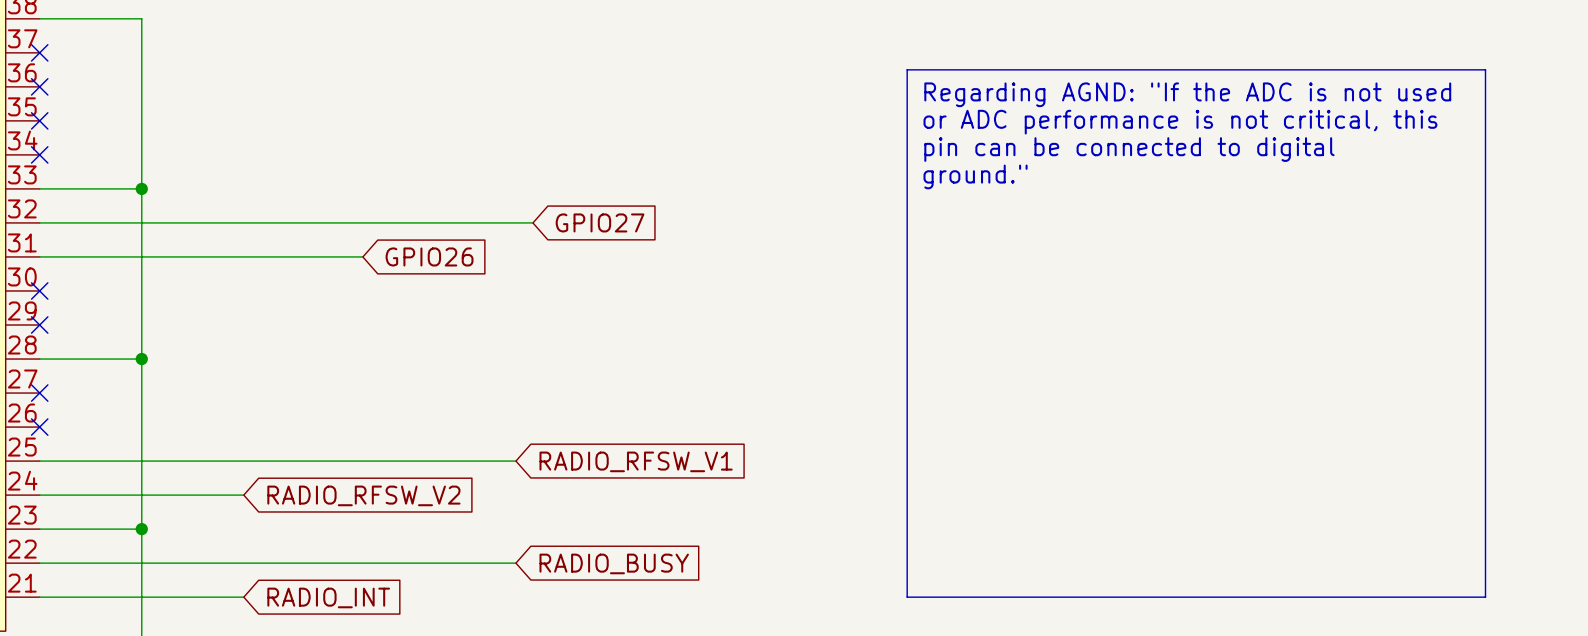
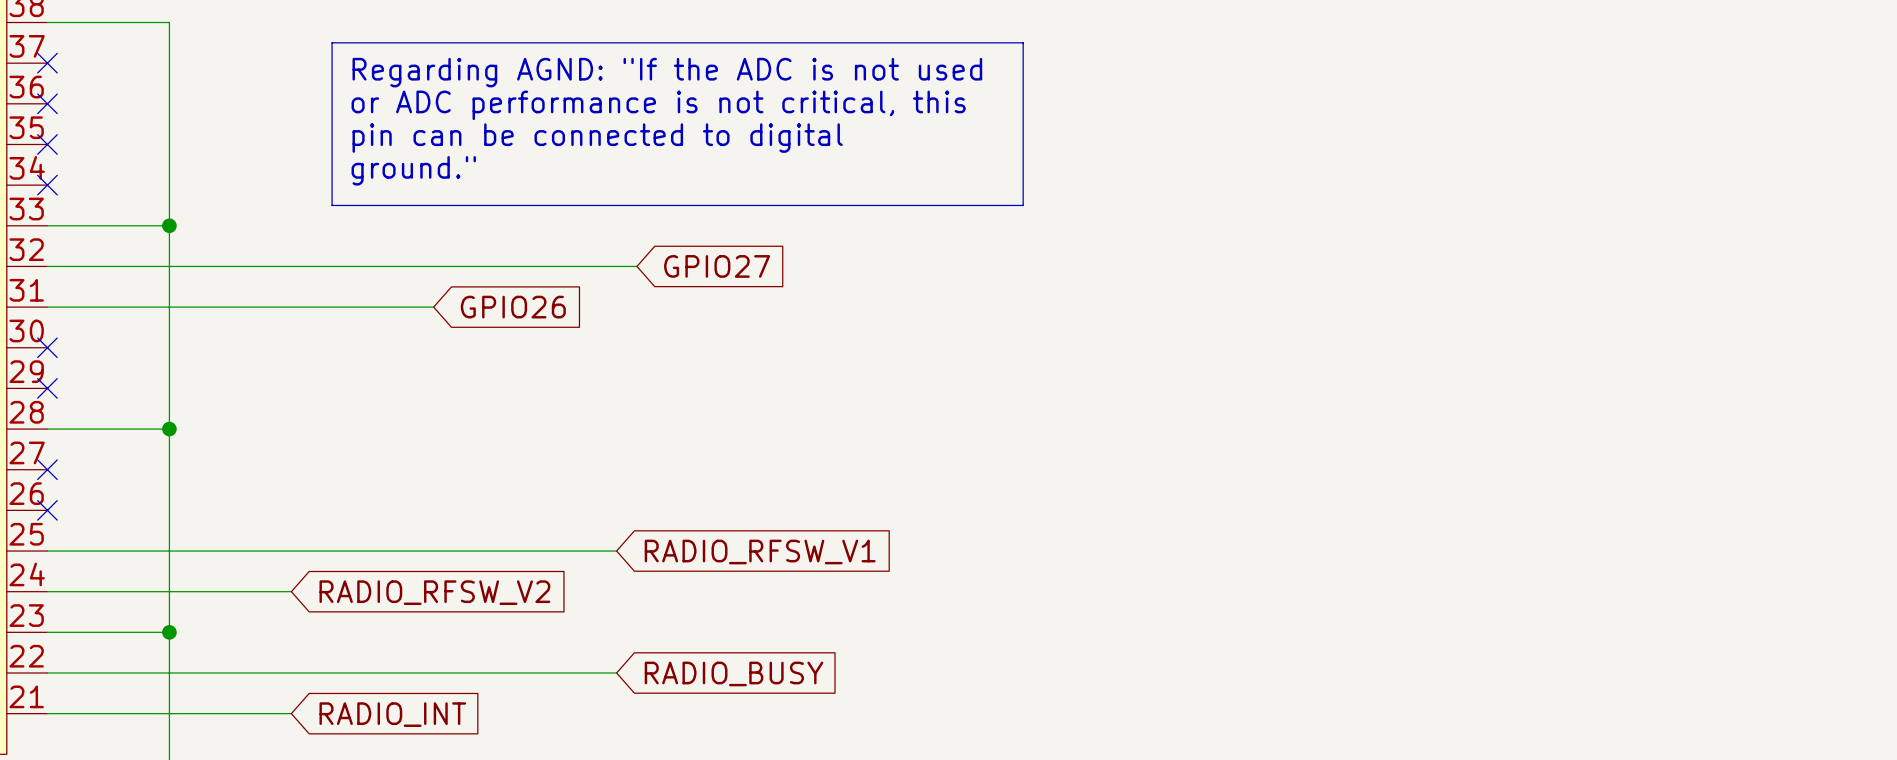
line: none -> (332, 42) (1023, 42) (1023, 205) (332, 205) (332, 42)
text: none -> Regarding AGND: "If the ADC is not used (667, 72)
line: (907, 69) (1485, 69) (1485, 597) (907, 597) (907, 69) -> none
text: none -> or ADC performance is not critical, this (658, 105)
text: Regarding AGND: "If the ADC is not used (1187, 94) -> none
text: none -> pin can be connected to digital (597, 138)
text: or ADC performance is not critical, this (1180, 122) -> none
text: none -> ground." (413, 170)
text: pin can be connected to digital (1129, 149) -> none
text: ground." (975, 176) -> none

